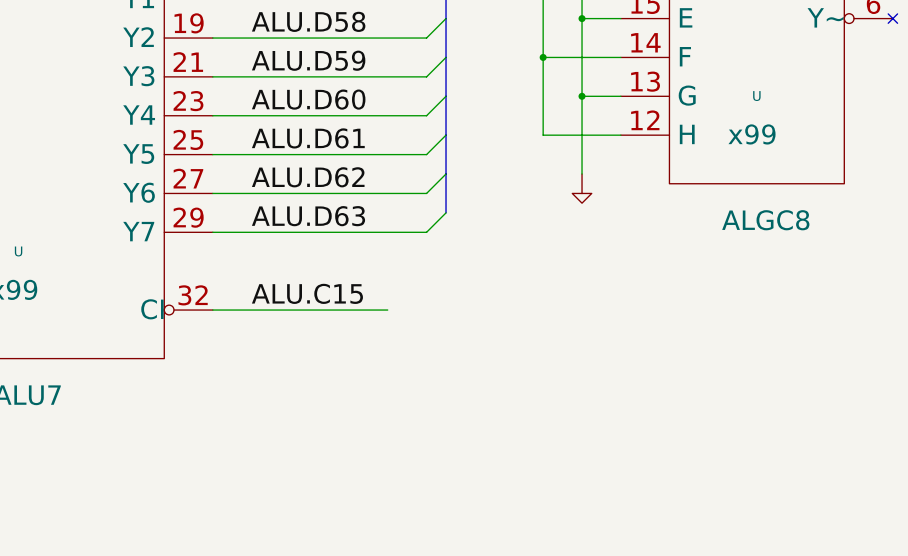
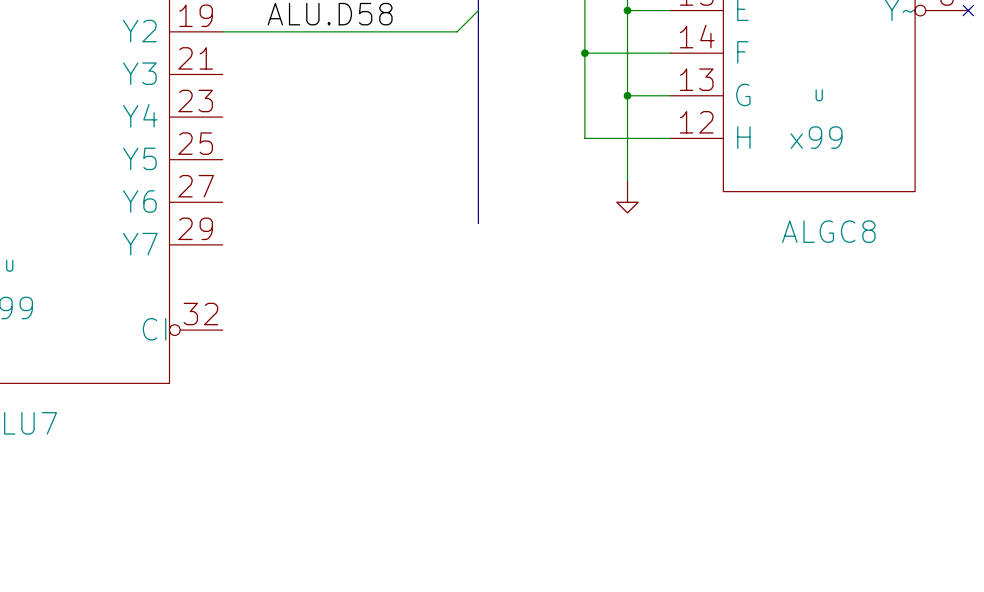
wire: (446, 57) (426, 76) (212, 76) -> none
label: ALU.D59 (308, 60) -> none
wire: (446, 96) (426, 115) (212, 115) -> none
label: ALU.D60 (308, 99) -> none
wire: (446, 135) (426, 154) (212, 154) -> none
label: ALU.D61 (308, 138) -> none
wire: (446, 174) (426, 193) (212, 193) -> none
label: ALU.D62 (308, 177) -> none
wire: (446, 212) (426, 232) (212, 232) -> none
label: ALU.D63 (308, 216) -> none
label: ALU.C15 (307, 293) -> none
wire: (212, 310) (387, 310) -> none

